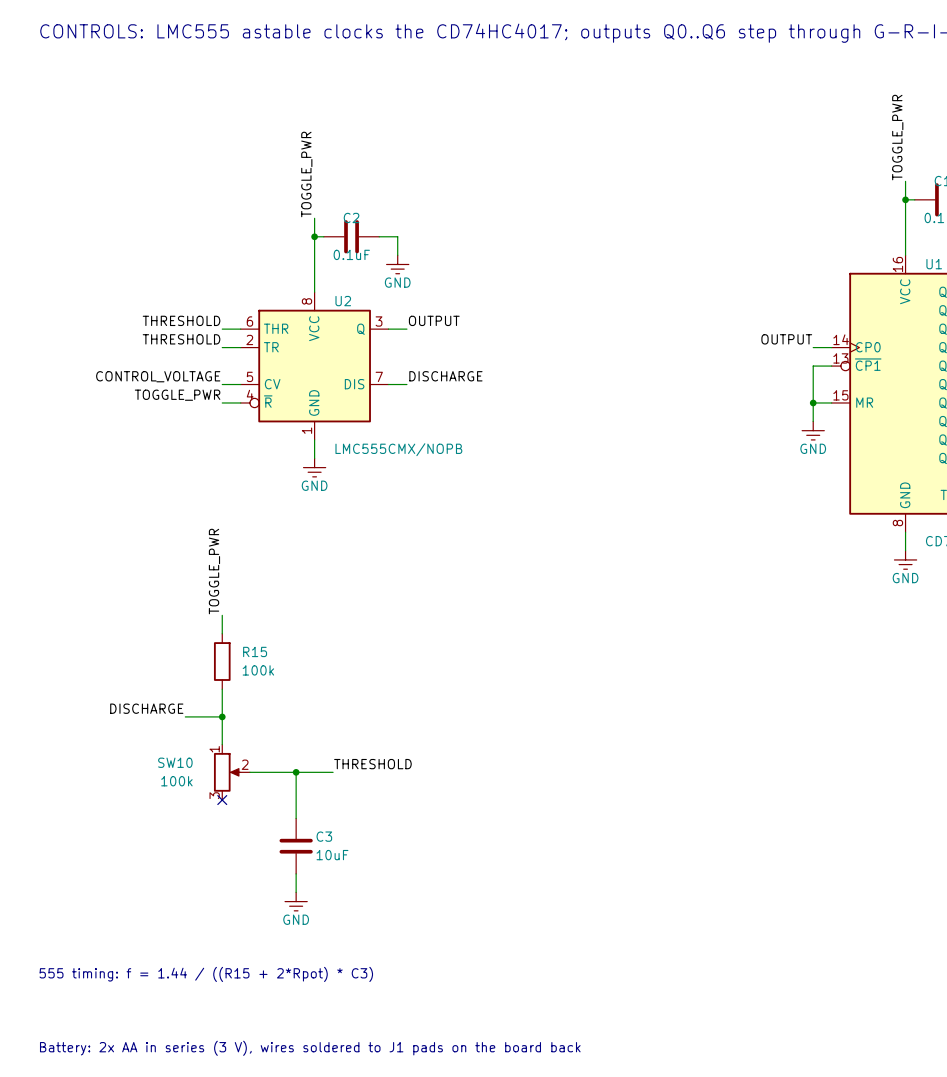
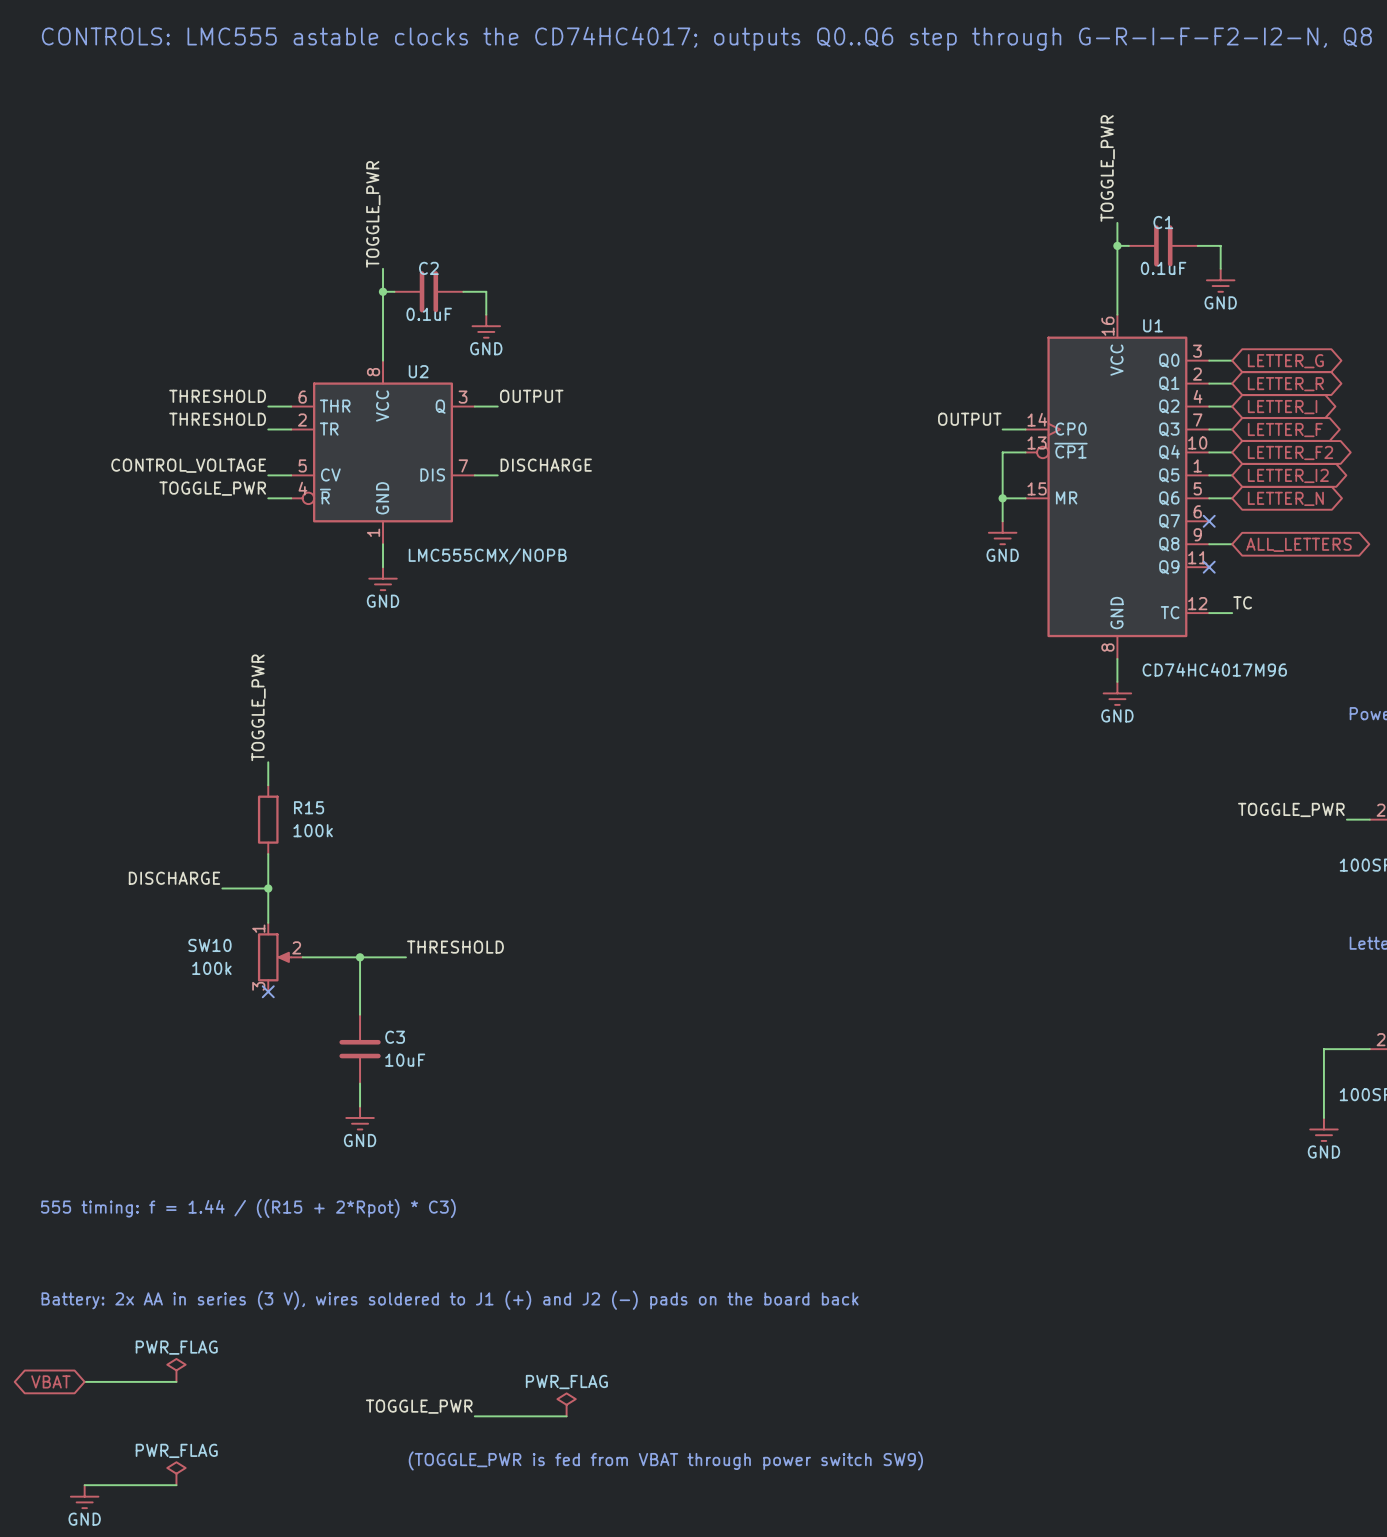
text: Battery: 2x AA in series (3 V), wires soldered to J1 pads on the board back (310, 1048) -> Battery: 2x AA in series (3 V), wires soldered to J1 (+) and J2 (-) pads on the board back (450, 1300)

